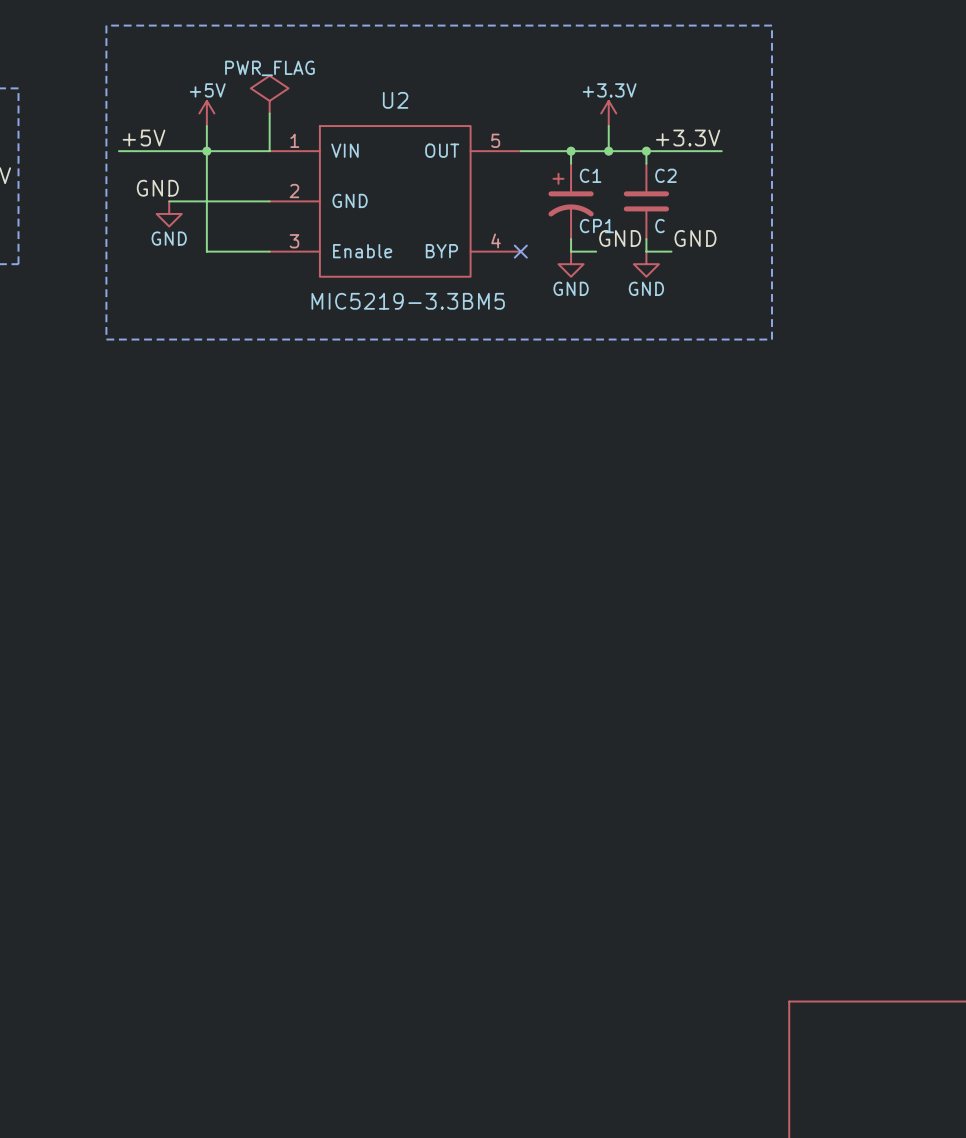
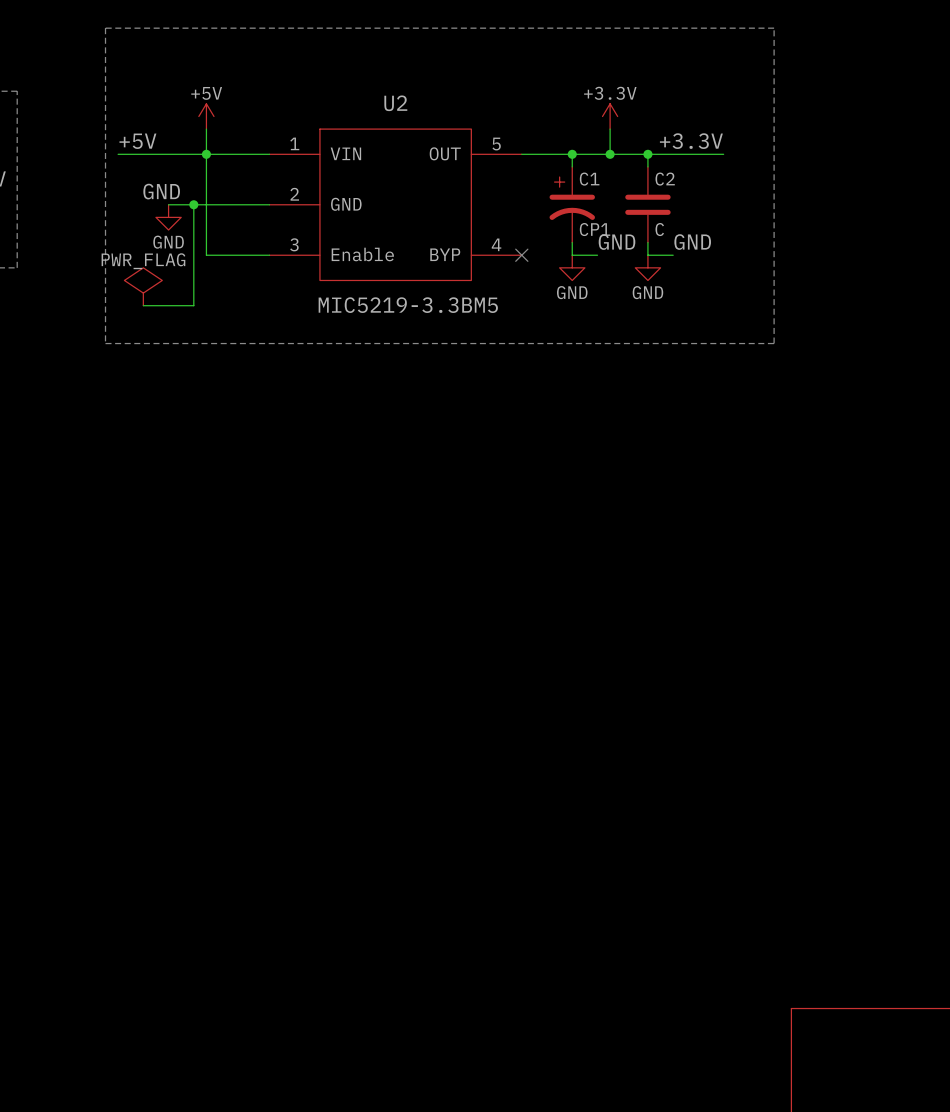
power symbol position: PWR_FLAG (269, 94) -> PWR_FLAG (143, 286)
wire: (269, 113) (269, 151) -> none
wire: none -> (193, 204) (193, 305) (143, 305)
junction: none -> (193, 204)

